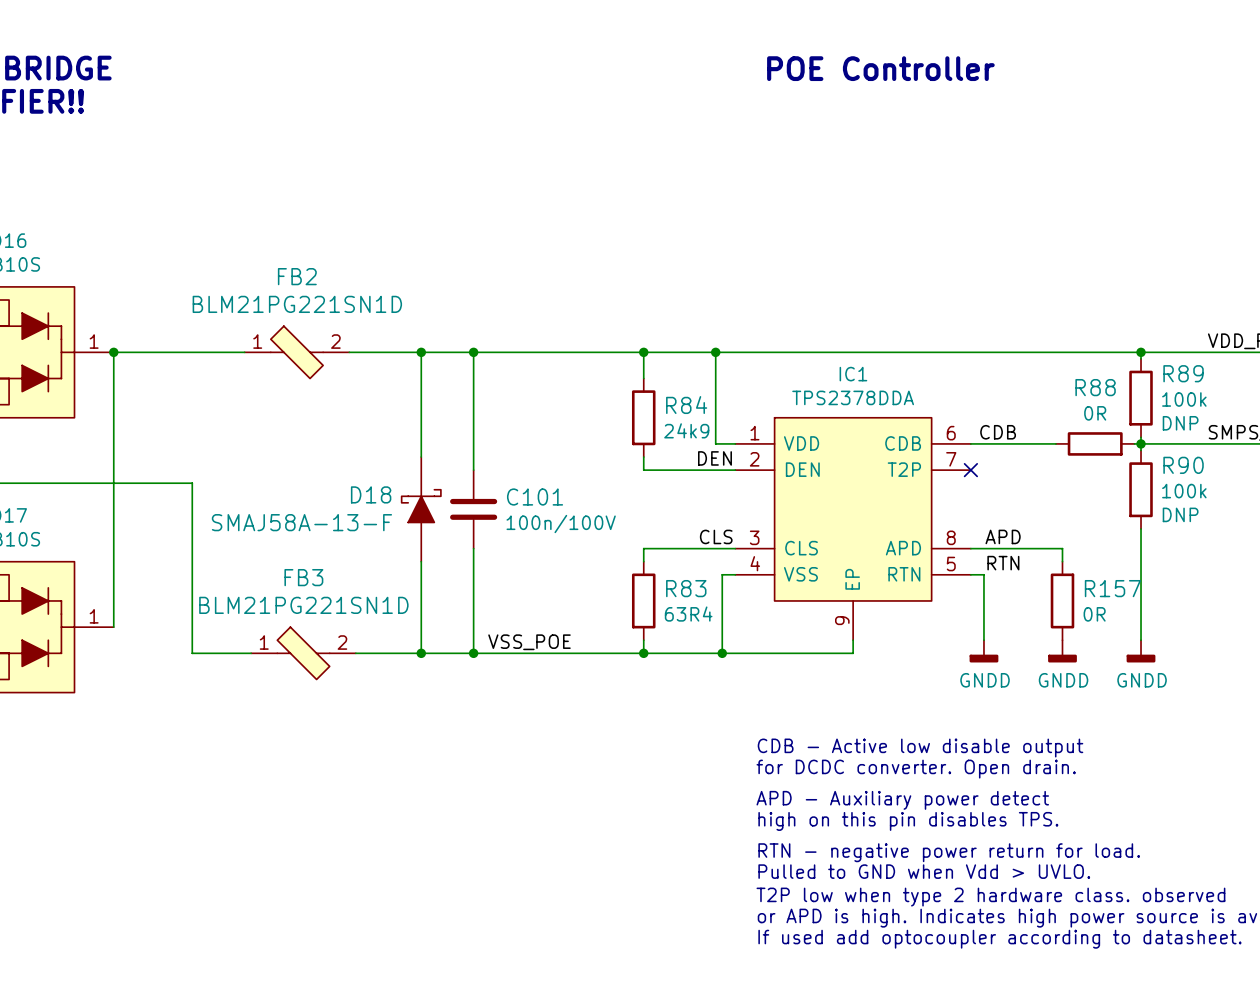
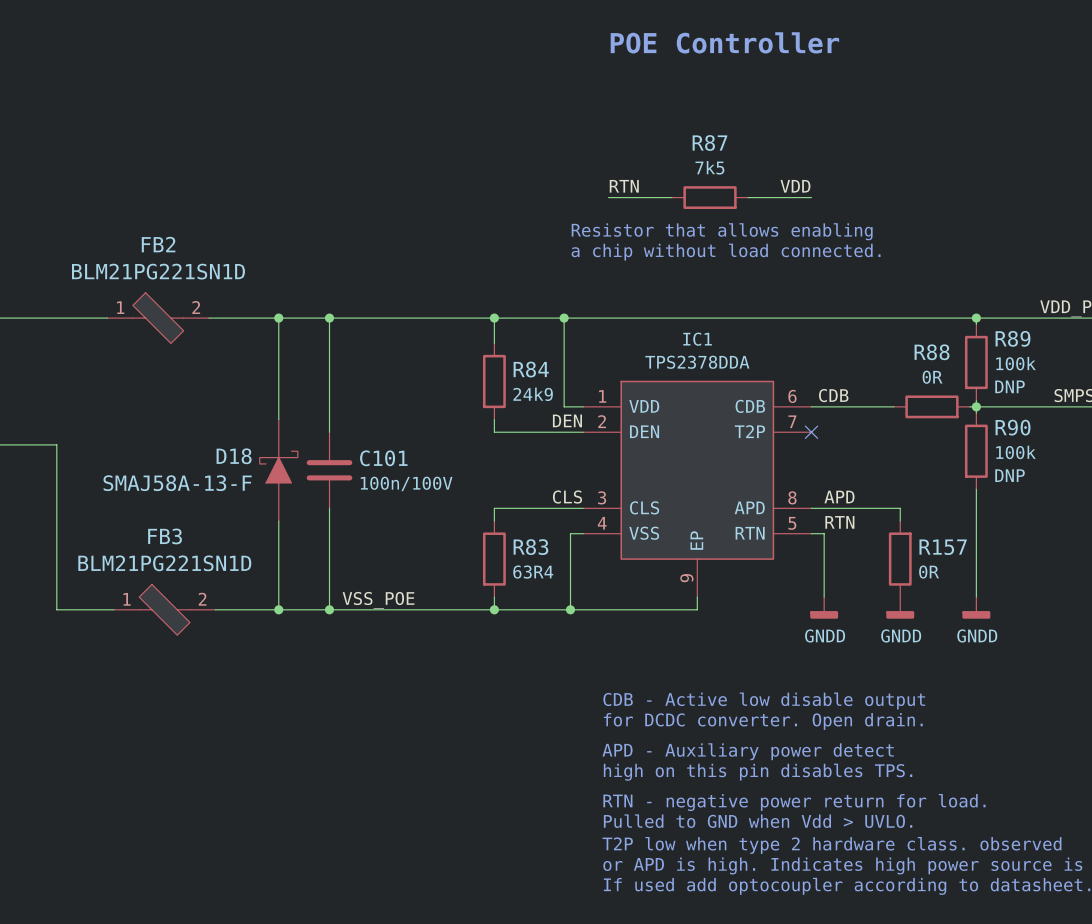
label: none -> RTN (624, 186)
label: none -> VDD (795, 186)
wire: none -> (608, 197) (671, 197)
R87: none -> (710, 197)
wire: none -> (748, 197) (811, 197)
text: none -> Resistor that allows enabling (722, 231)
text: none -> a chip without load connected. (726, 252)

